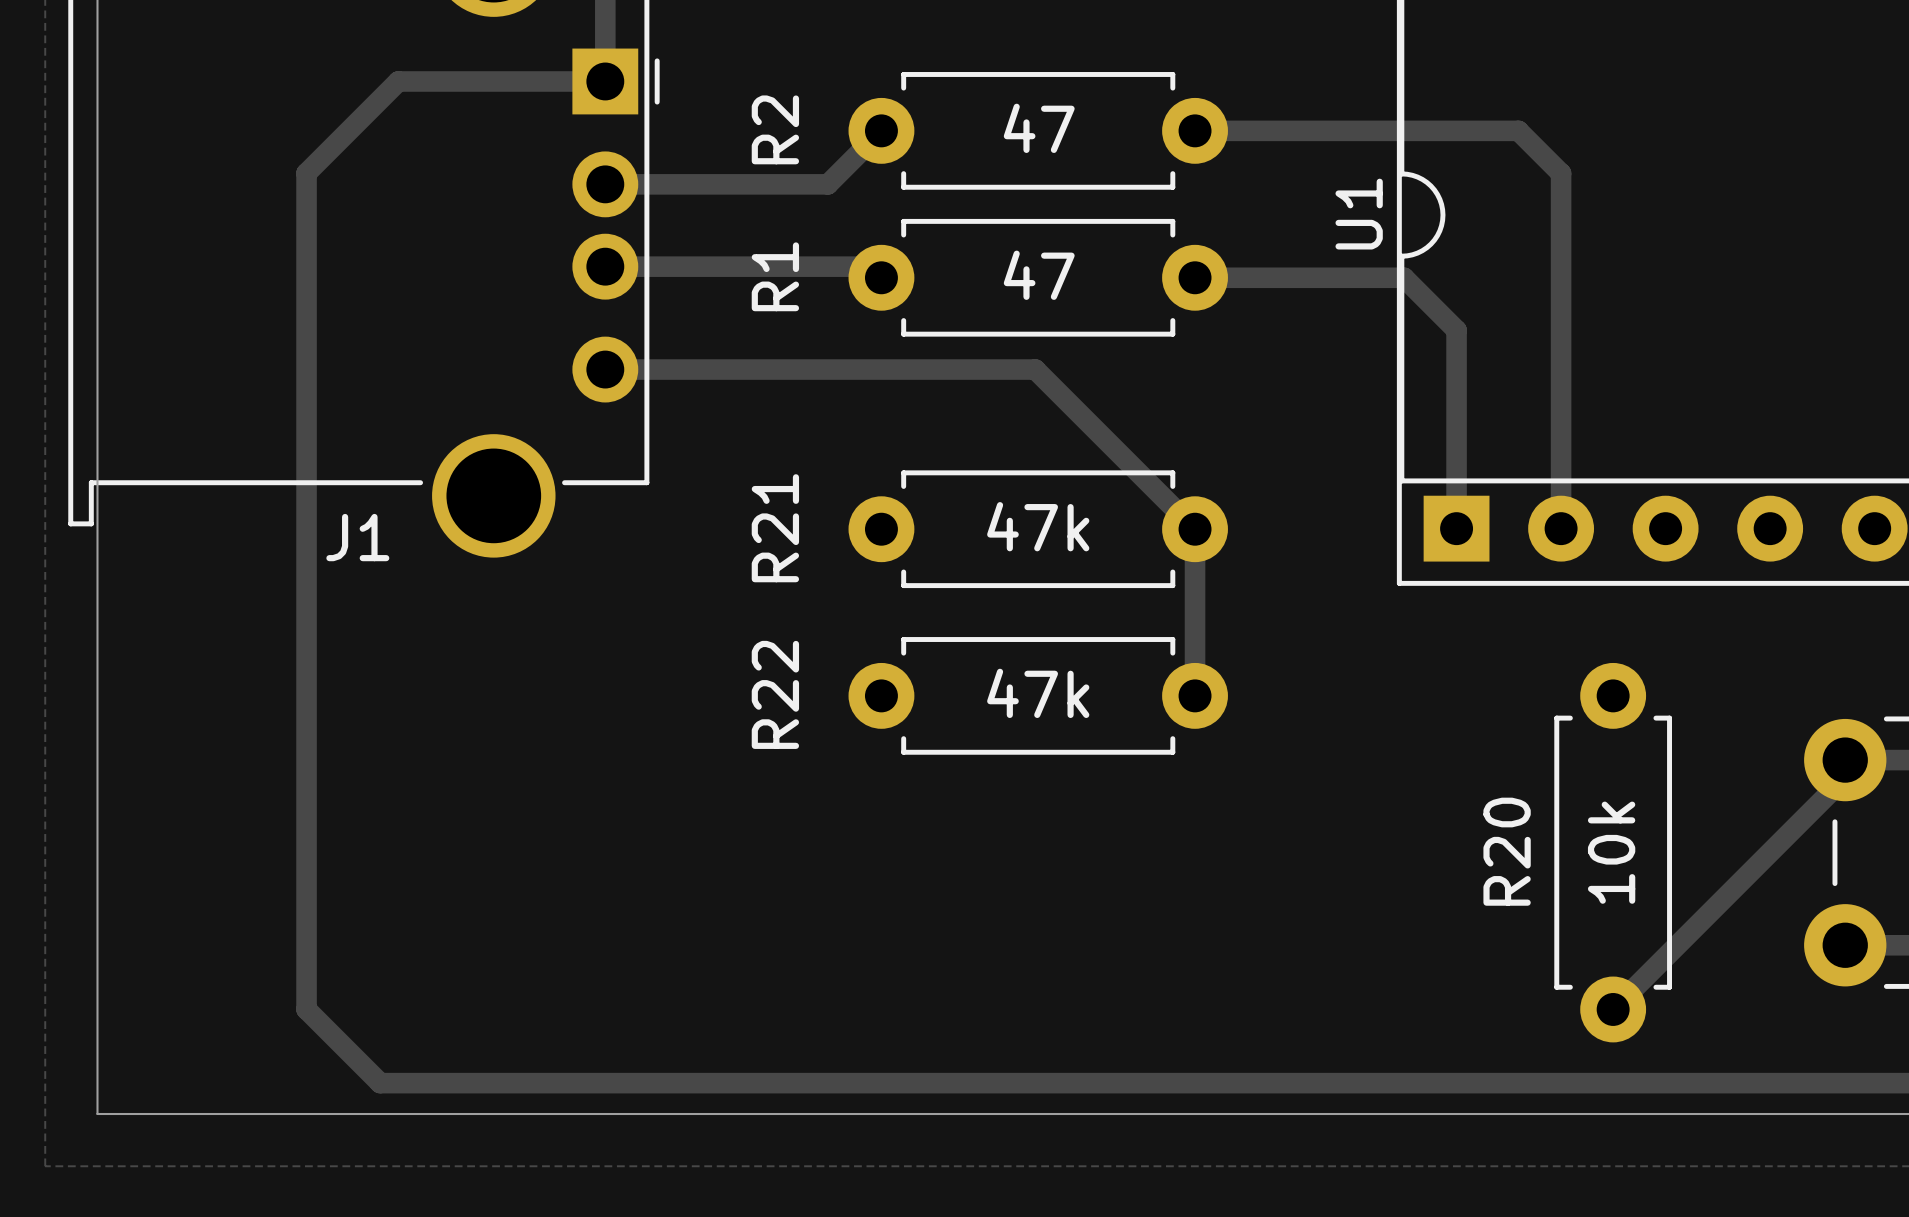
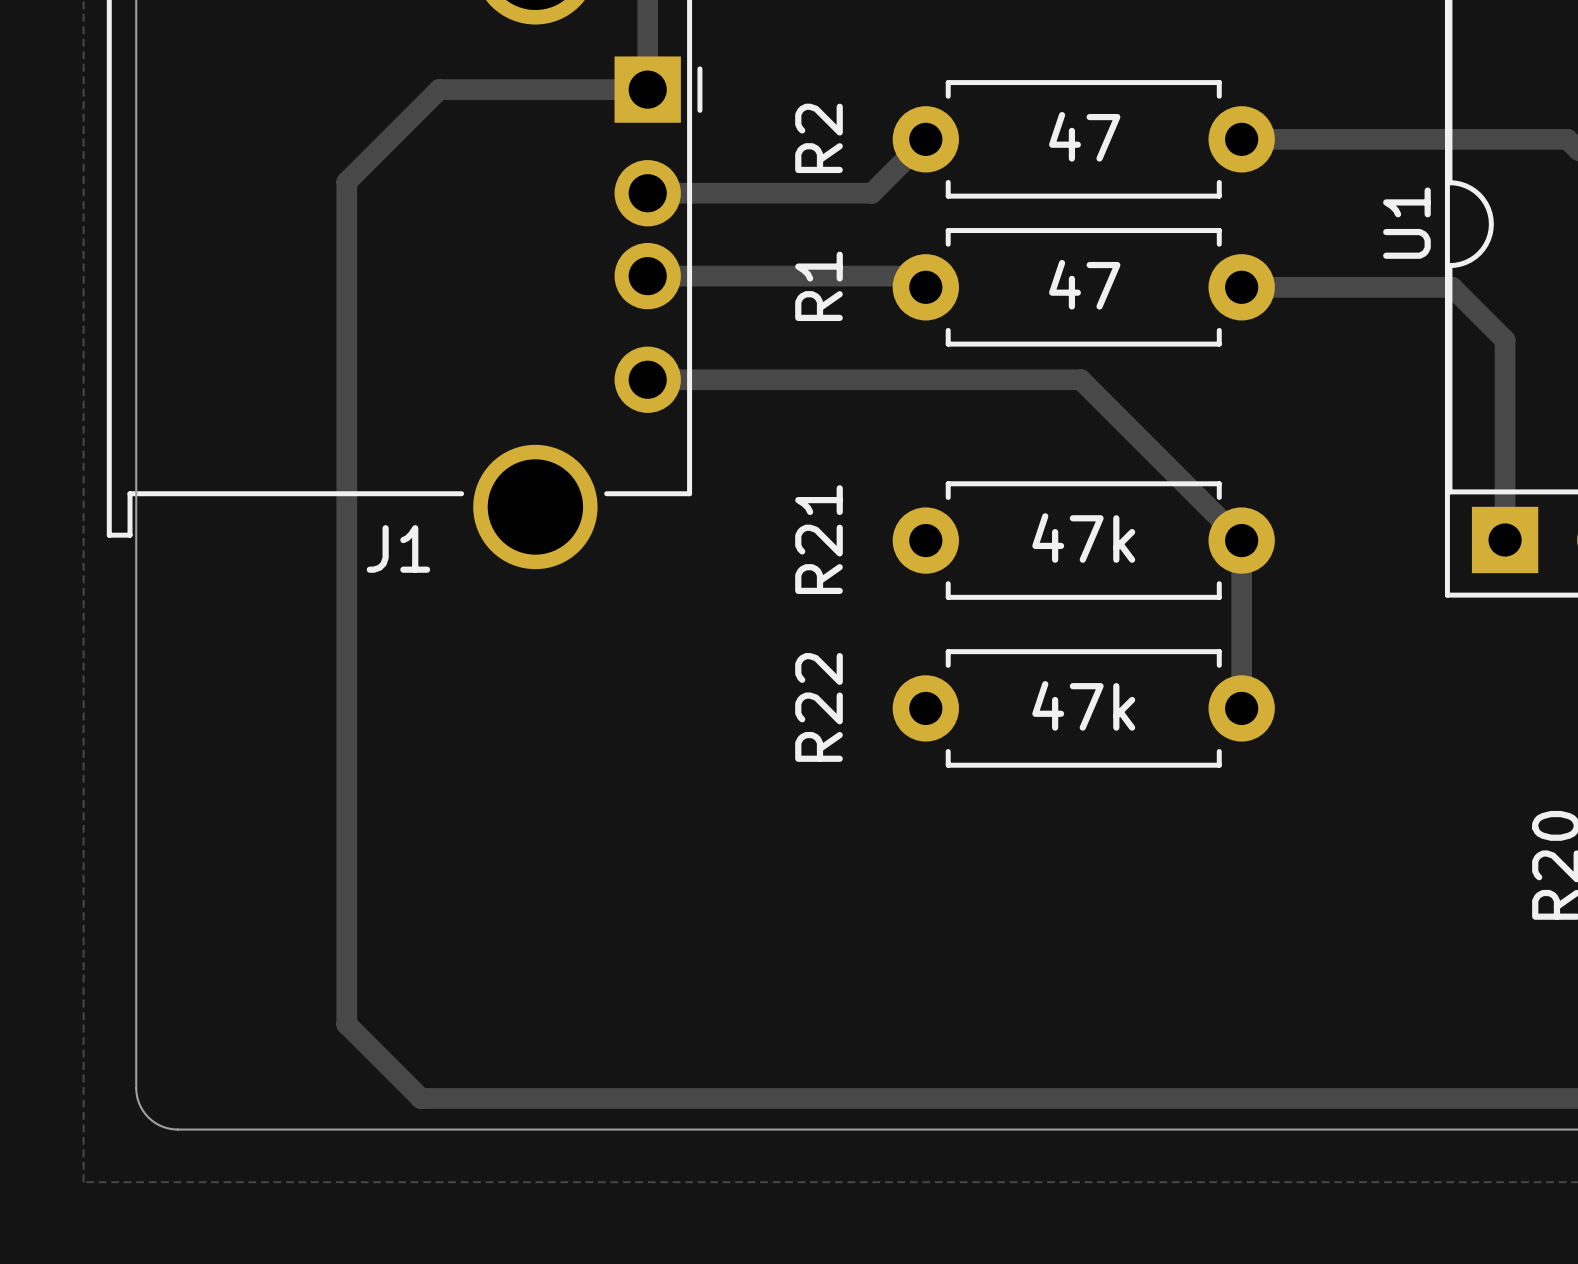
board edge: (97, 1072) (97, 1114) (138, 1114) -> (136, 1088) (140, 1106) (148, 1117) (159, 1125) (177, 1129)

